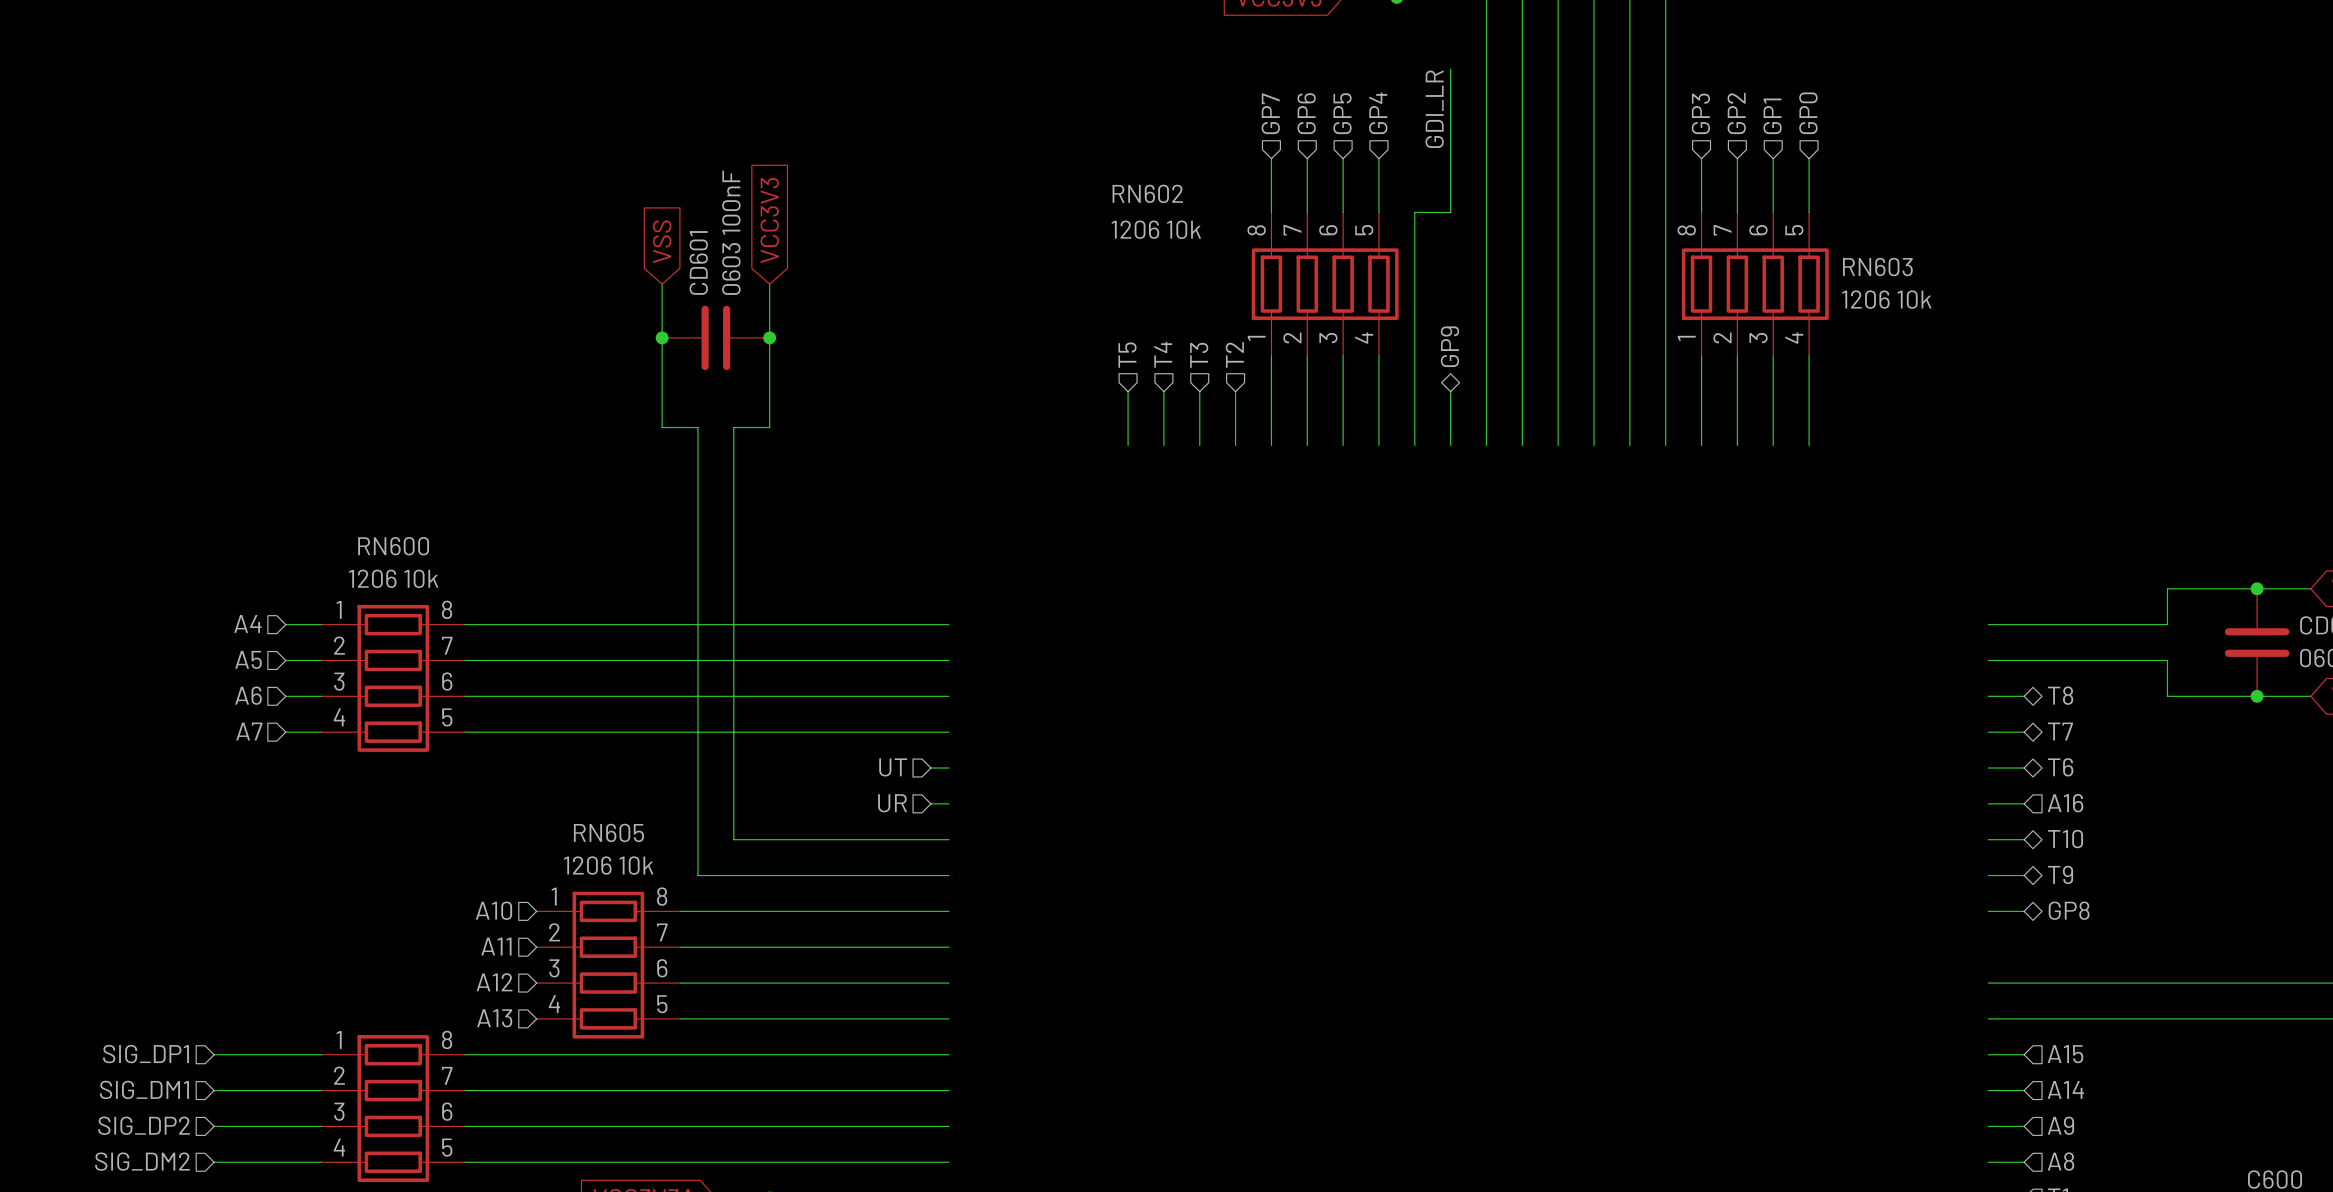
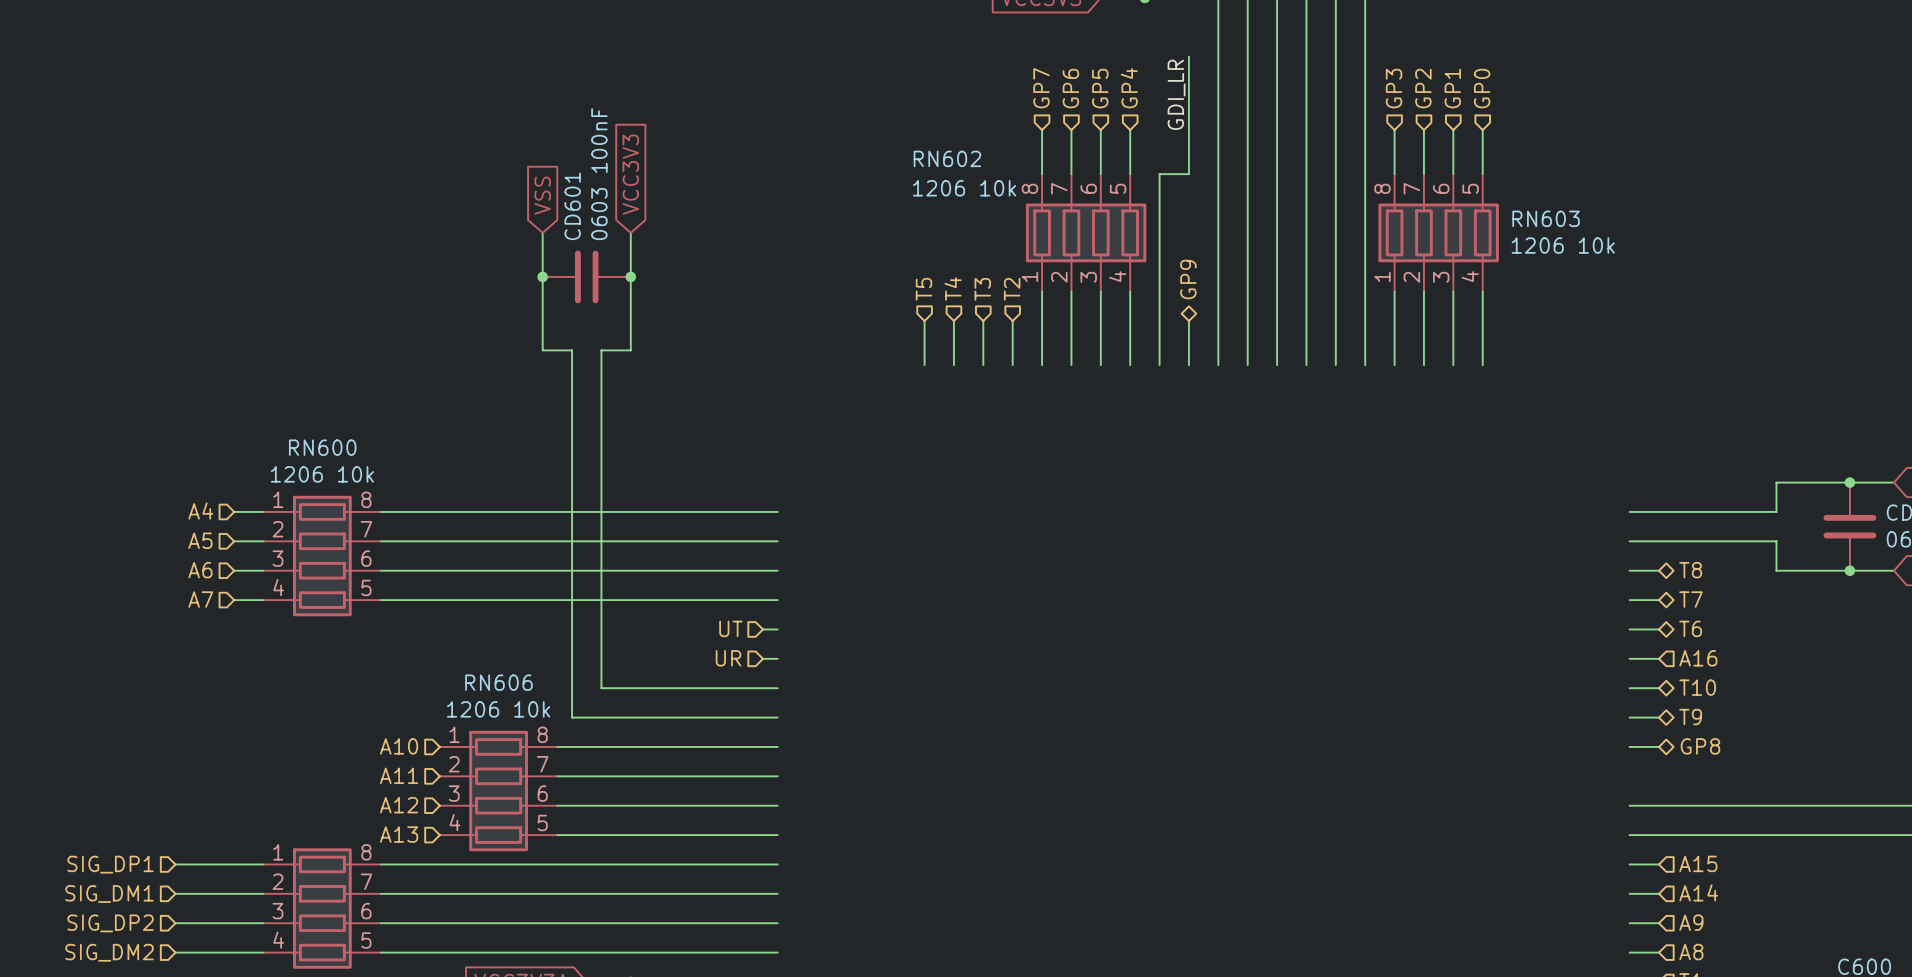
RN605 name: RN605 (608, 832) -> RN606 (498, 682)

